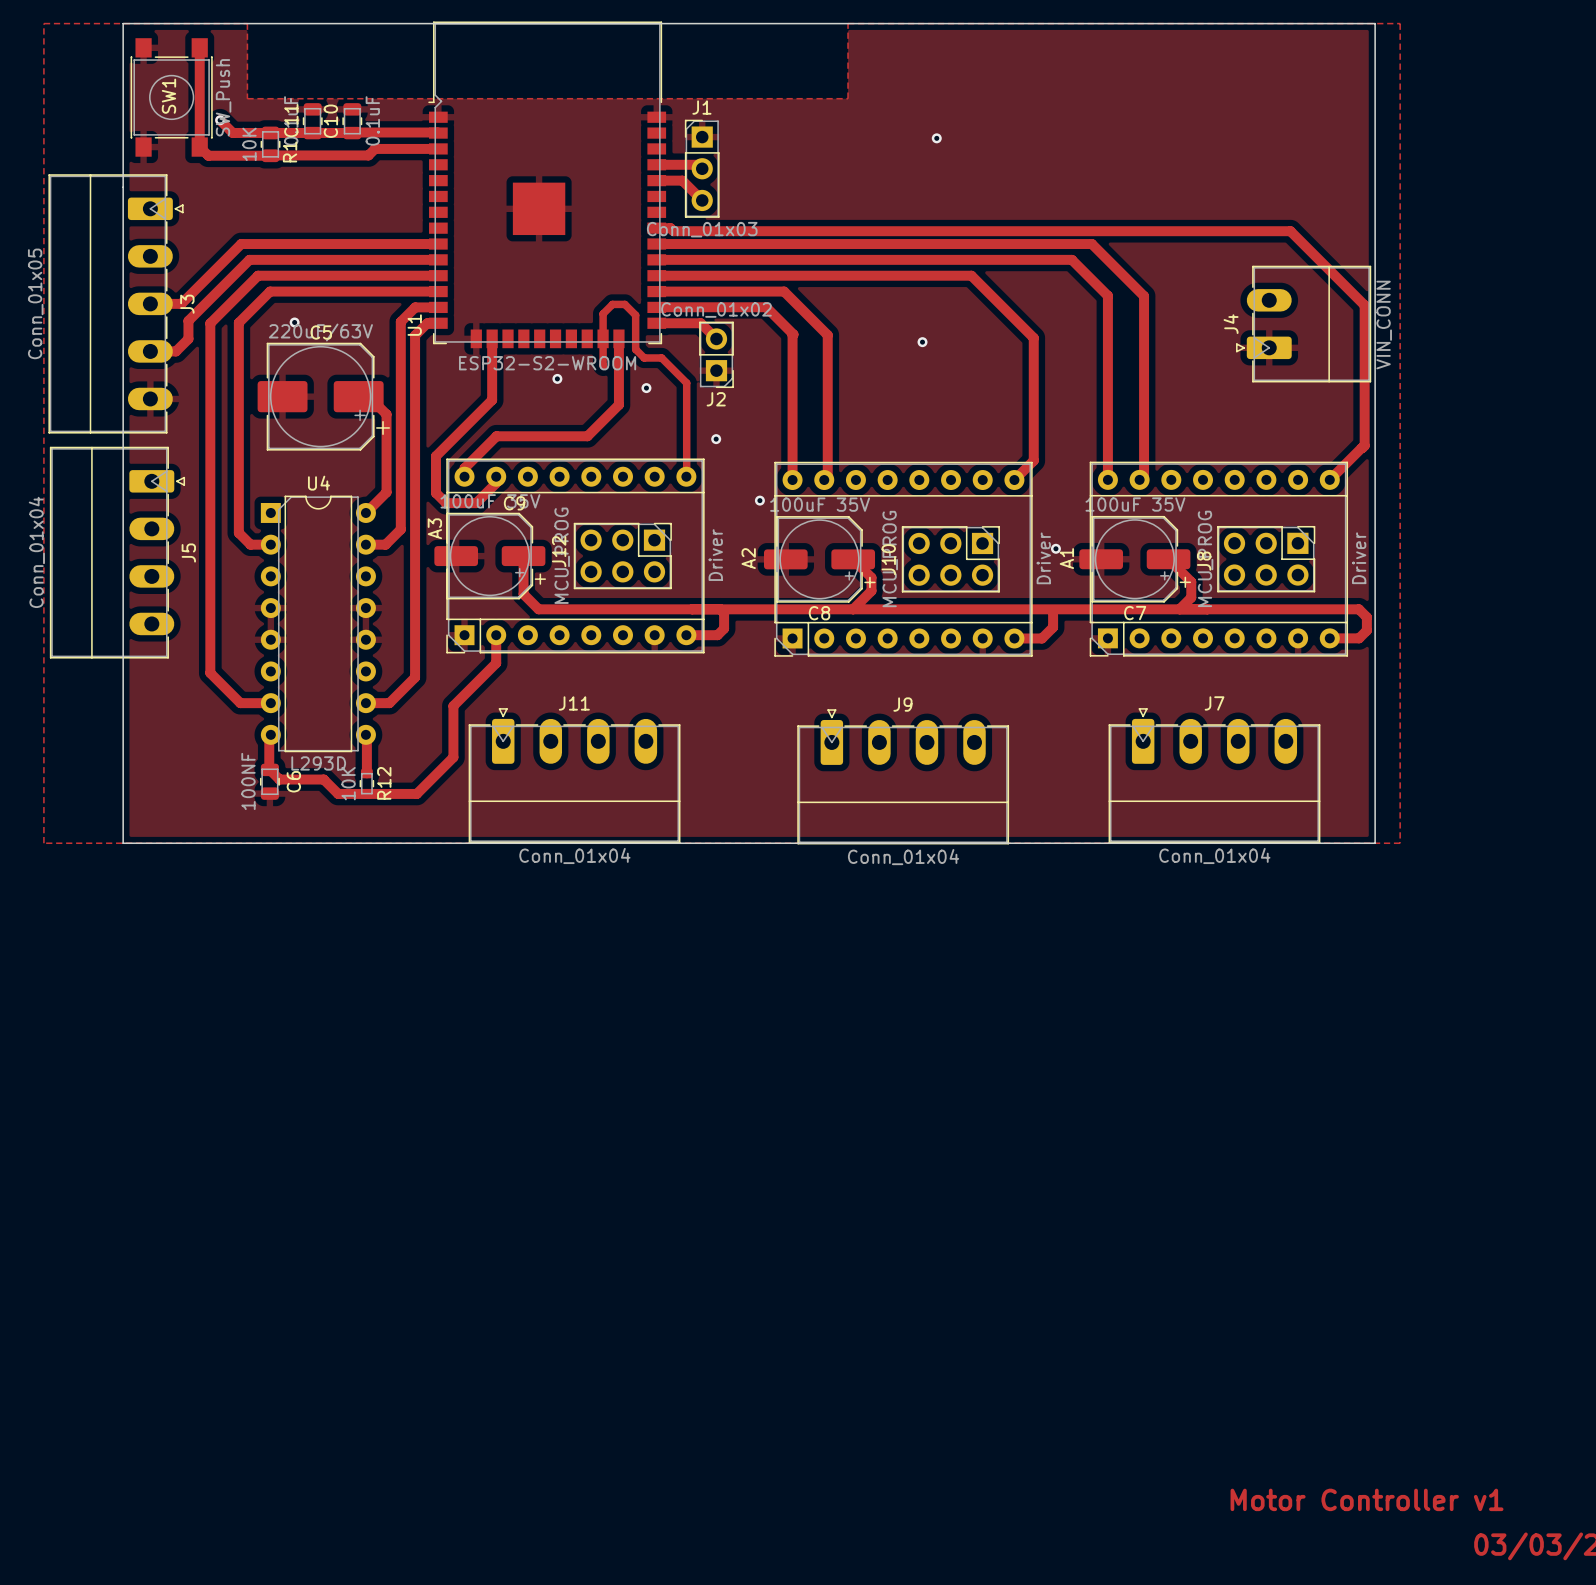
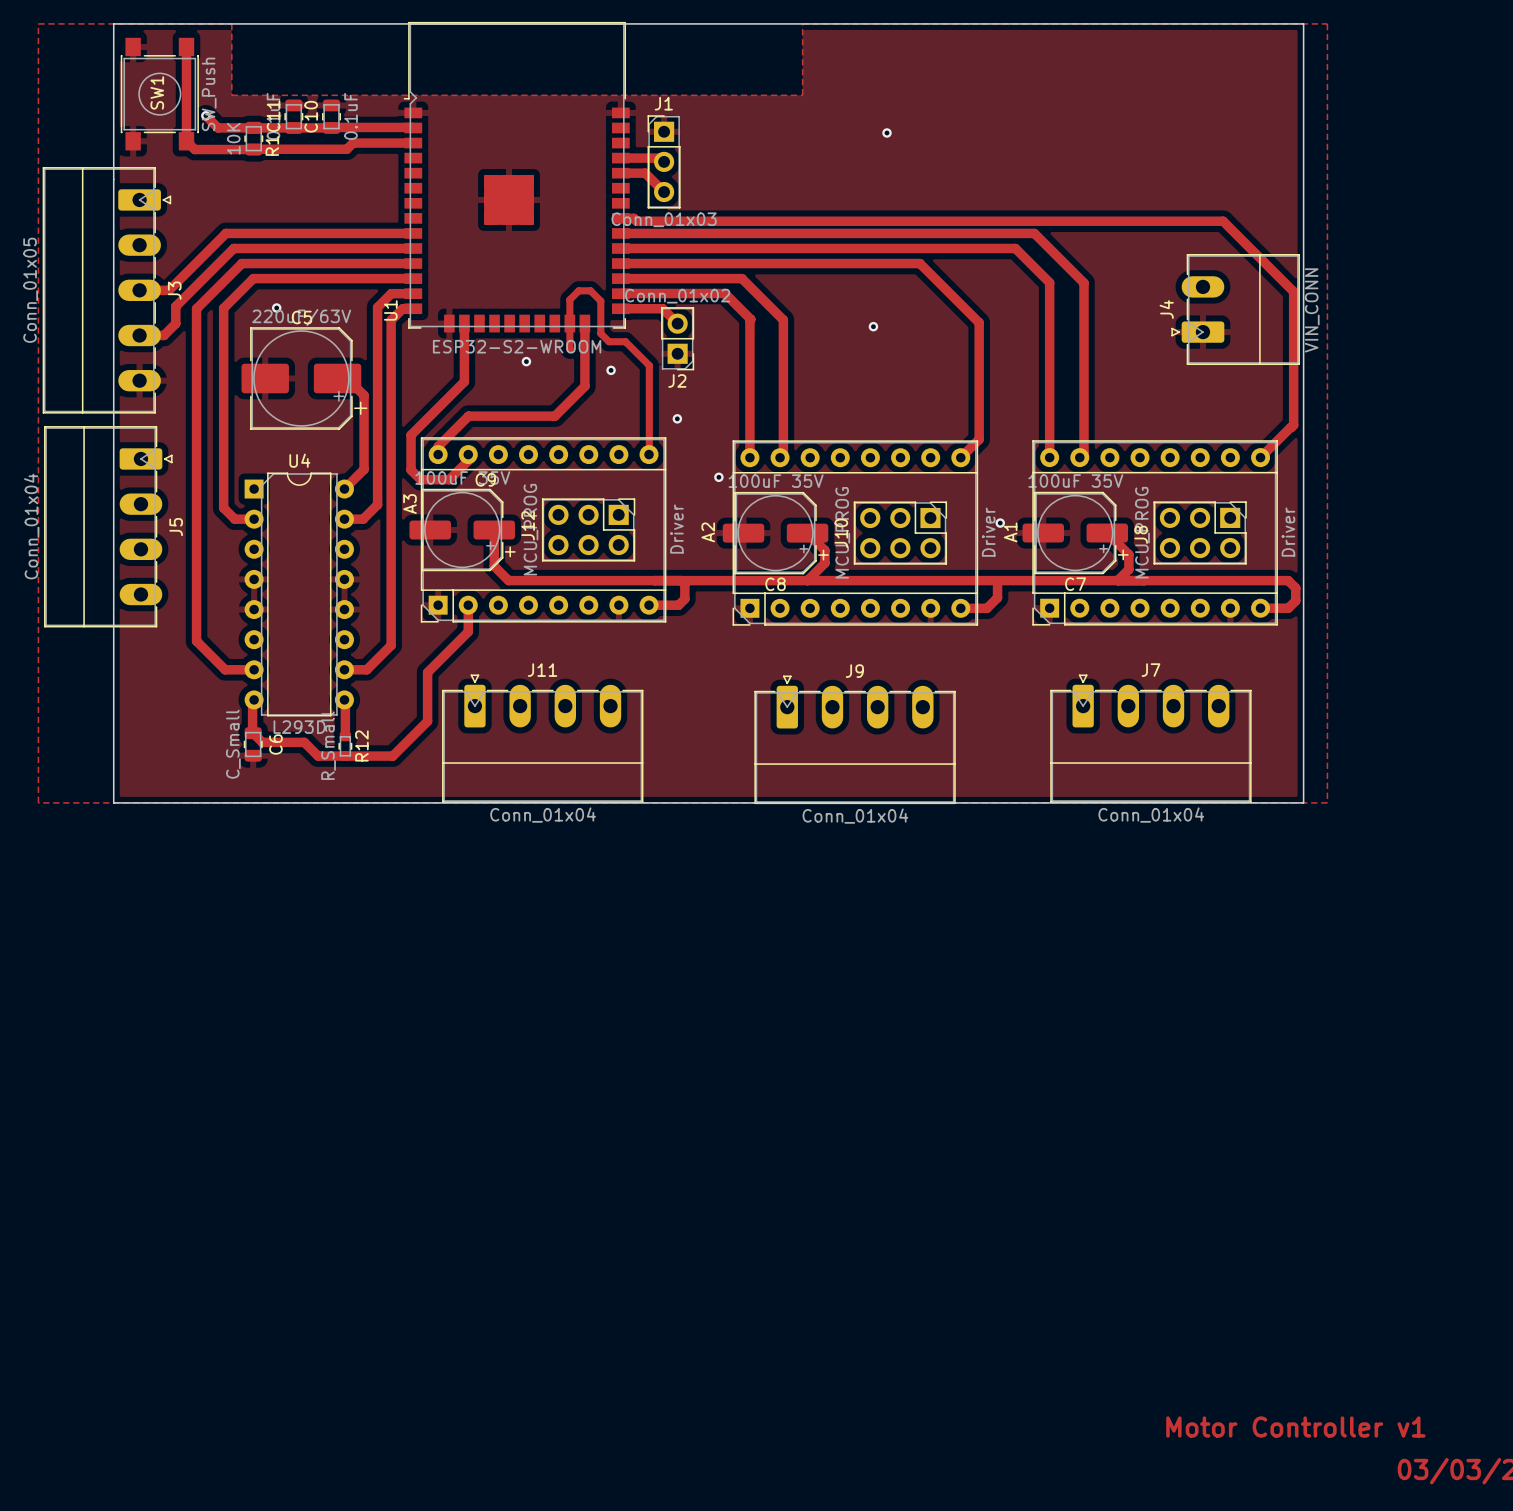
C6 value: 100NF (248, 781) -> C_Small (233, 744)
R12 value: 10K (348, 783) -> R_Small (328, 745)

